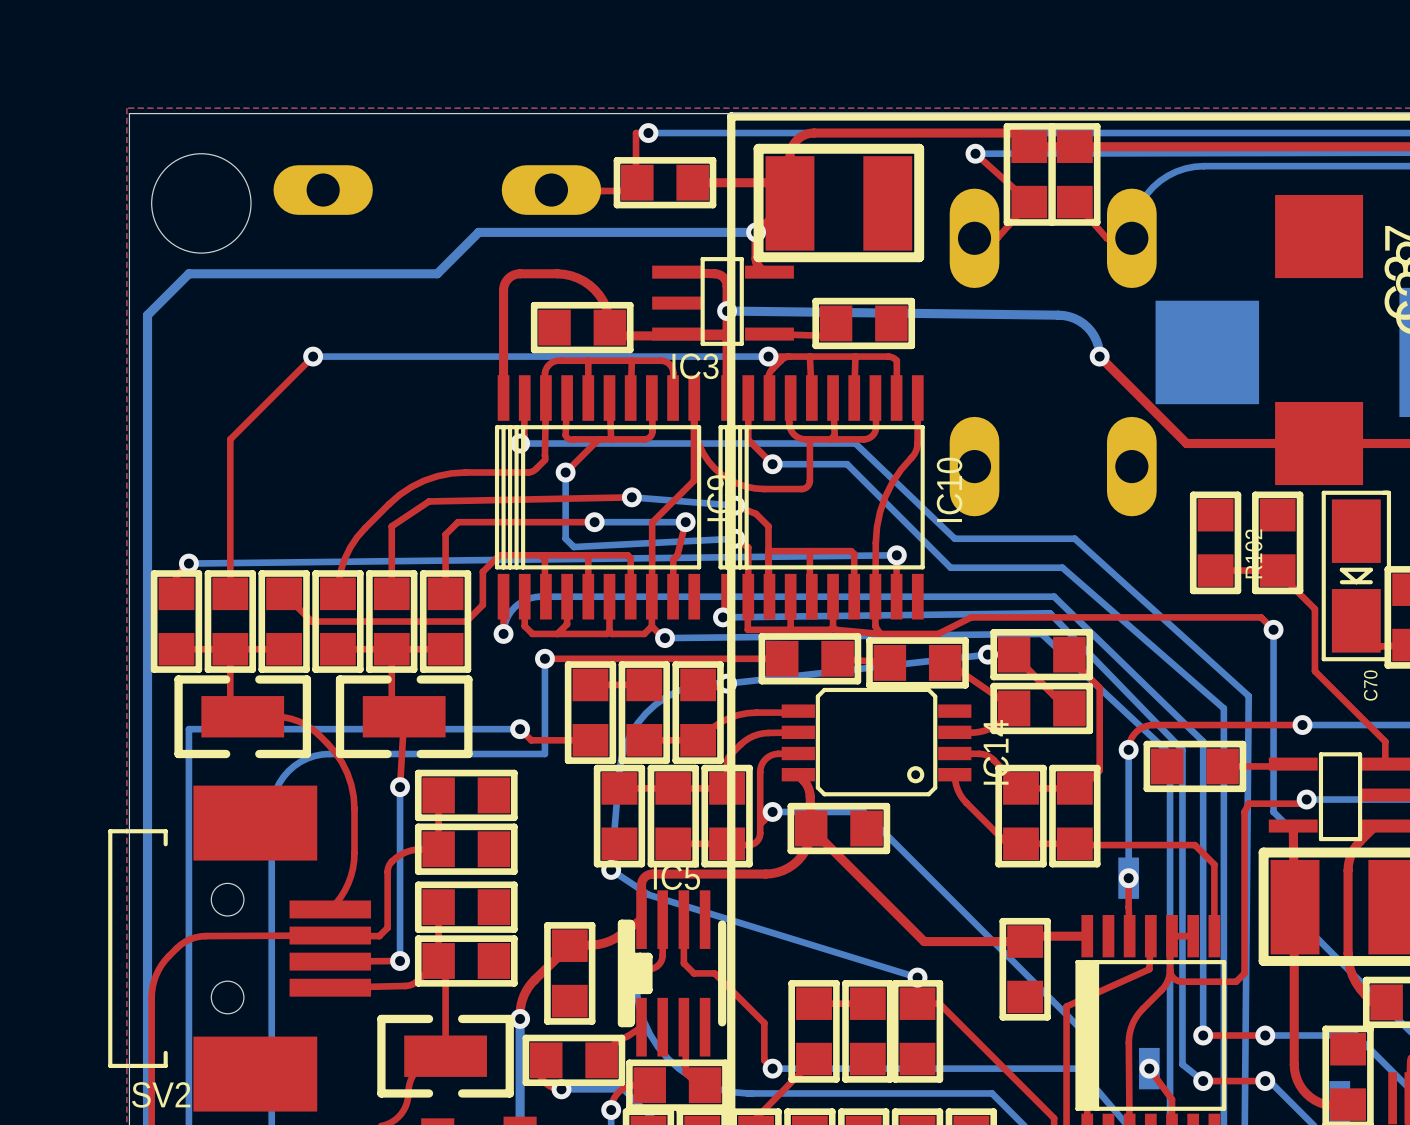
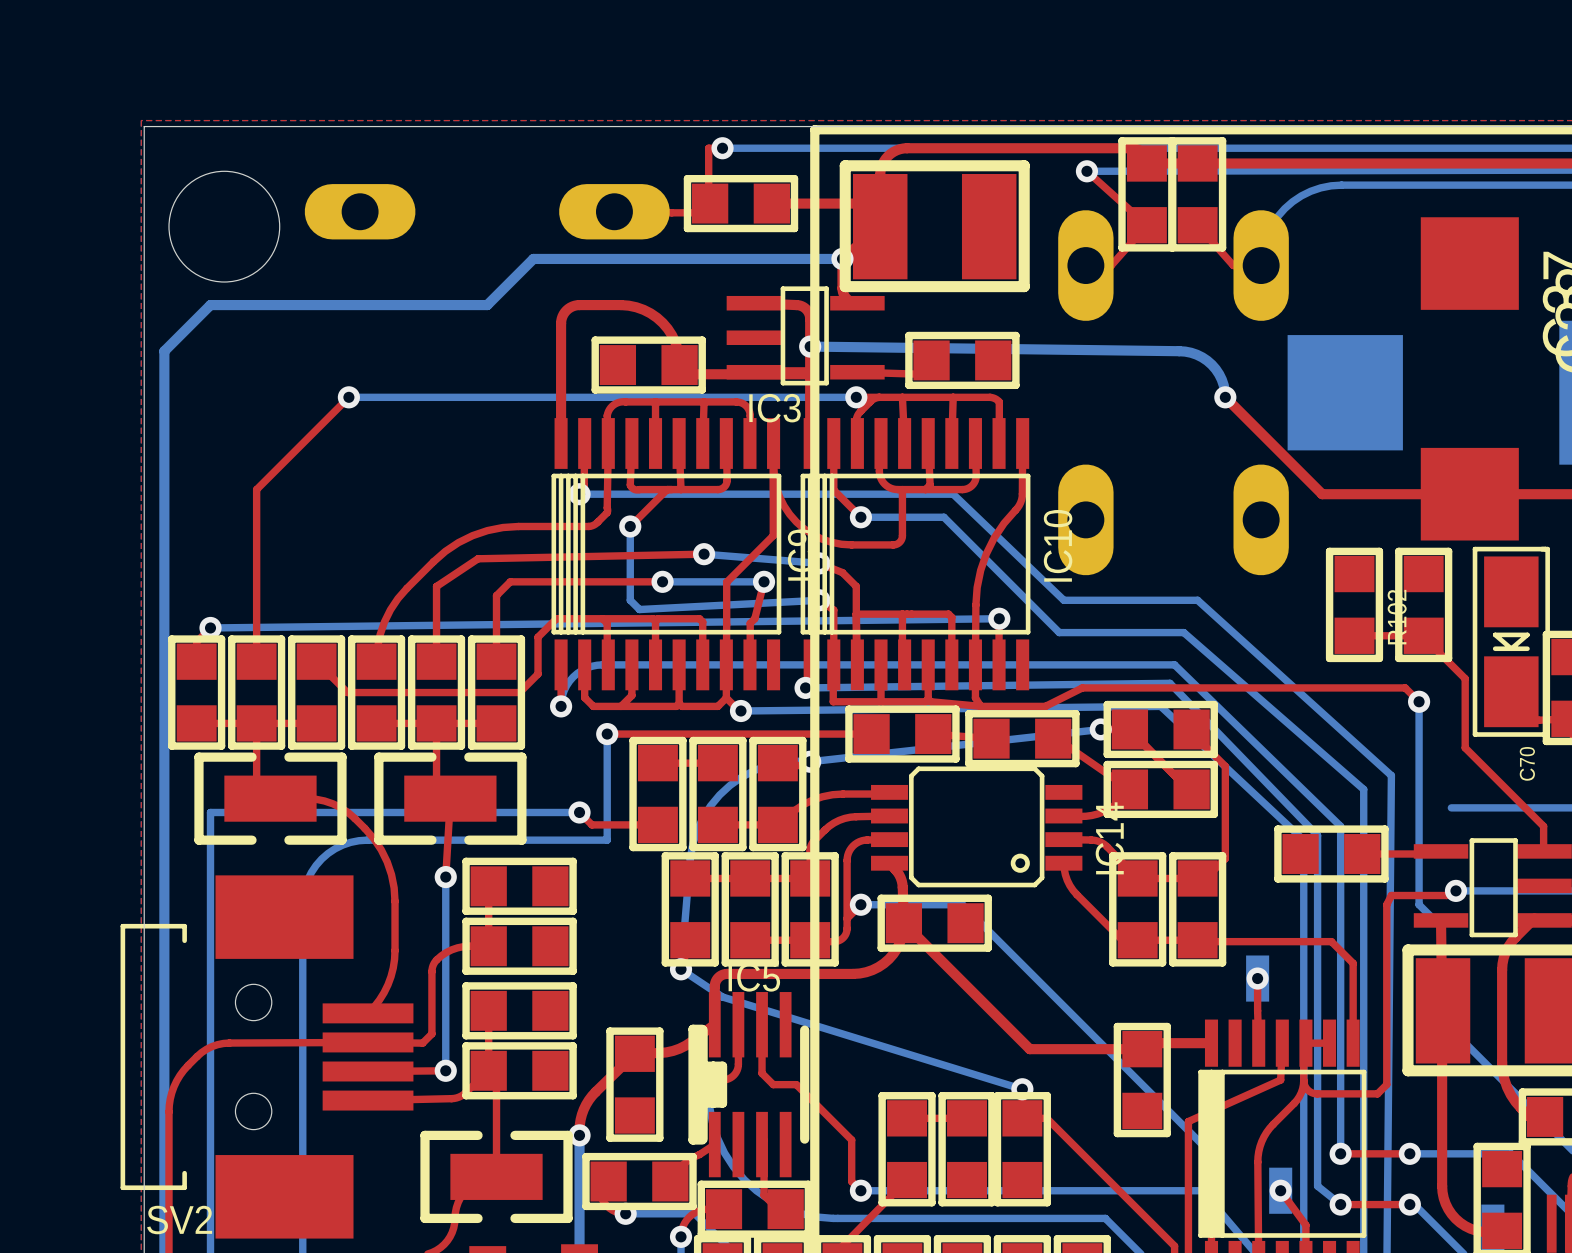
top track: (1302, 725) (1150, 725) (1135, 732) (1130, 740) (1128, 749) -> none
via: (1302, 725) -> none
bottom track: (1128, 749) (1128, 878) -> none
via: (1128, 749) -> none

